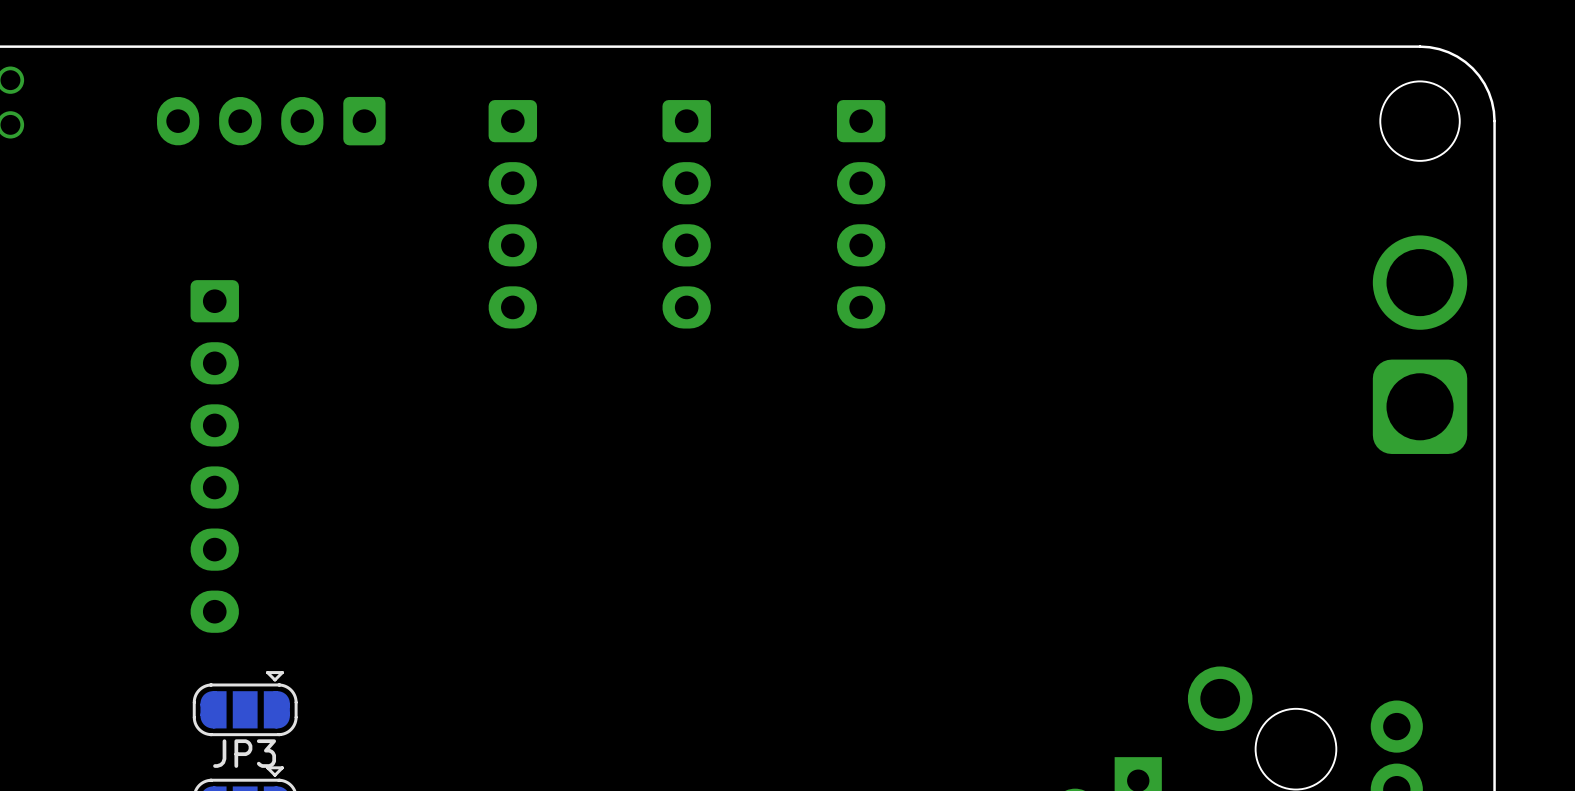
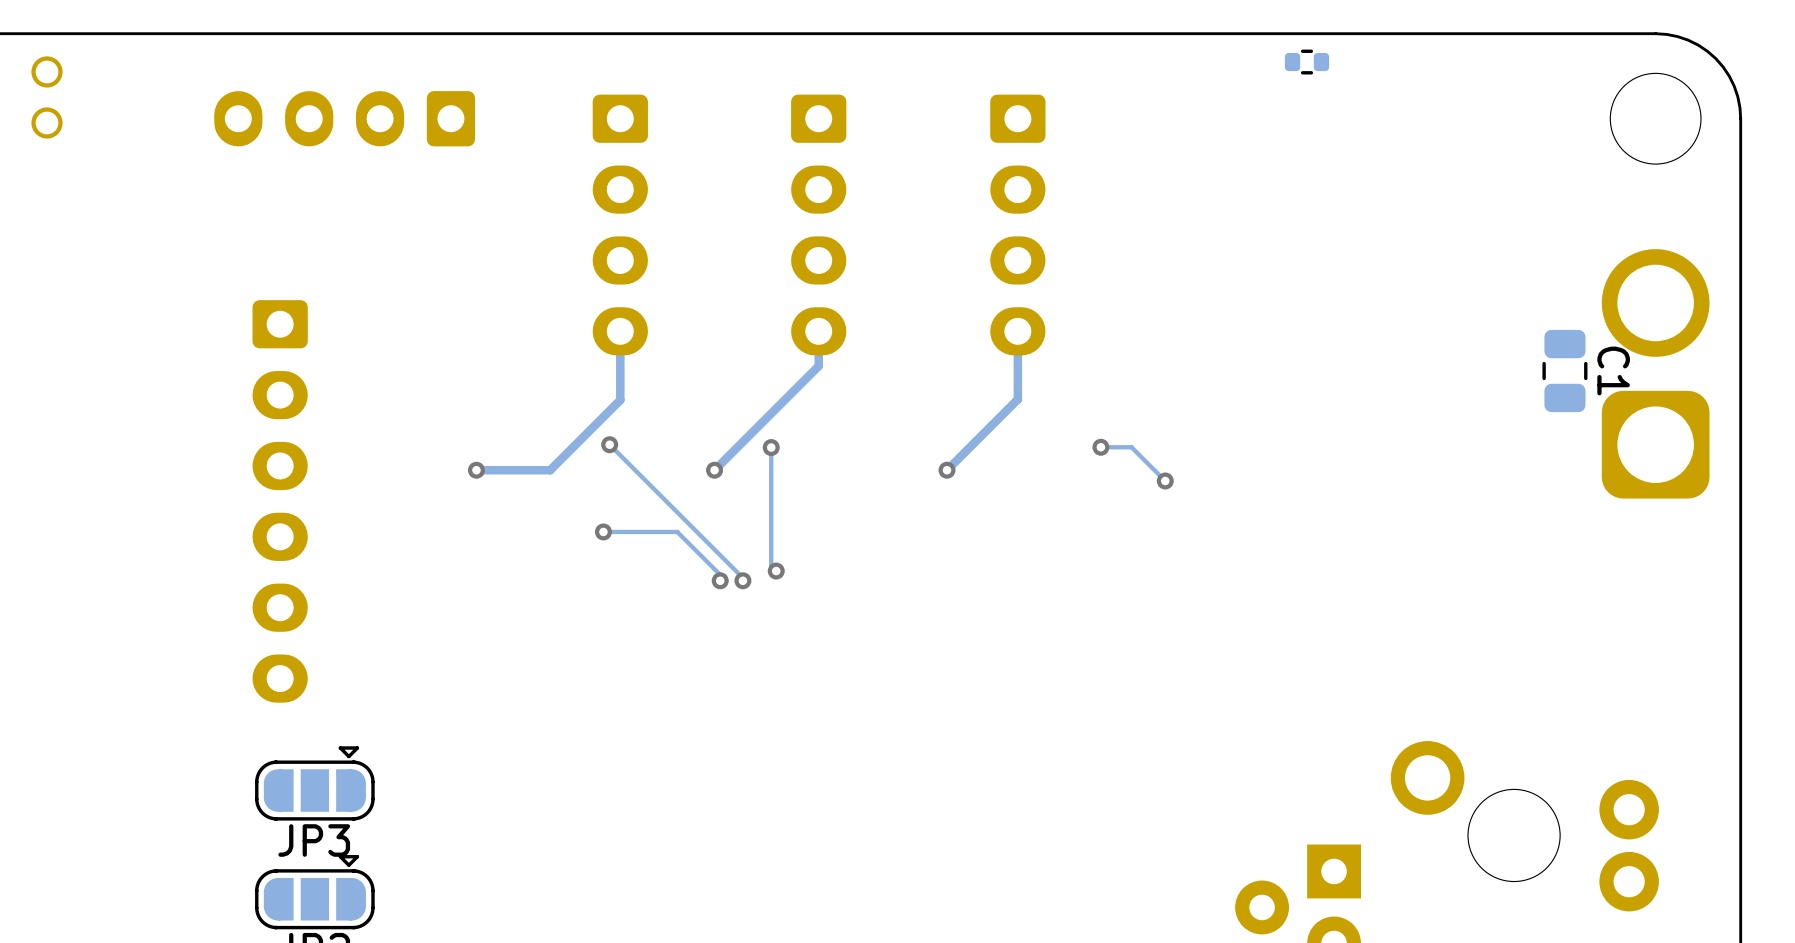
part: none -> (1307, 62)
track: none -> (620, 331) (620, 400) (550, 470) (476, 470)
track: none -> (818, 331) (818, 366) (714, 470)
track: none -> (1017, 331) (1017, 399) (947, 470)
C1: none -> (1564, 371)
track: none -> (609, 444) (742, 577) (742, 580)
via: none -> (609, 444)
track: none -> (771, 447) (771, 566) (776, 571)
via: none -> (771, 447)
track: none -> (1100, 447) (1131, 447) (1165, 480)
via: none -> (1100, 447)
via: none -> (476, 470)
via: none -> (714, 470)
via: none -> (947, 470)
via: none -> (1165, 480)
track: none -> (603, 531) (677, 531) (720, 574) (720, 580)
via: none -> (603, 531)
via: none -> (776, 571)
via: none -> (720, 580)
via: none -> (742, 580)

